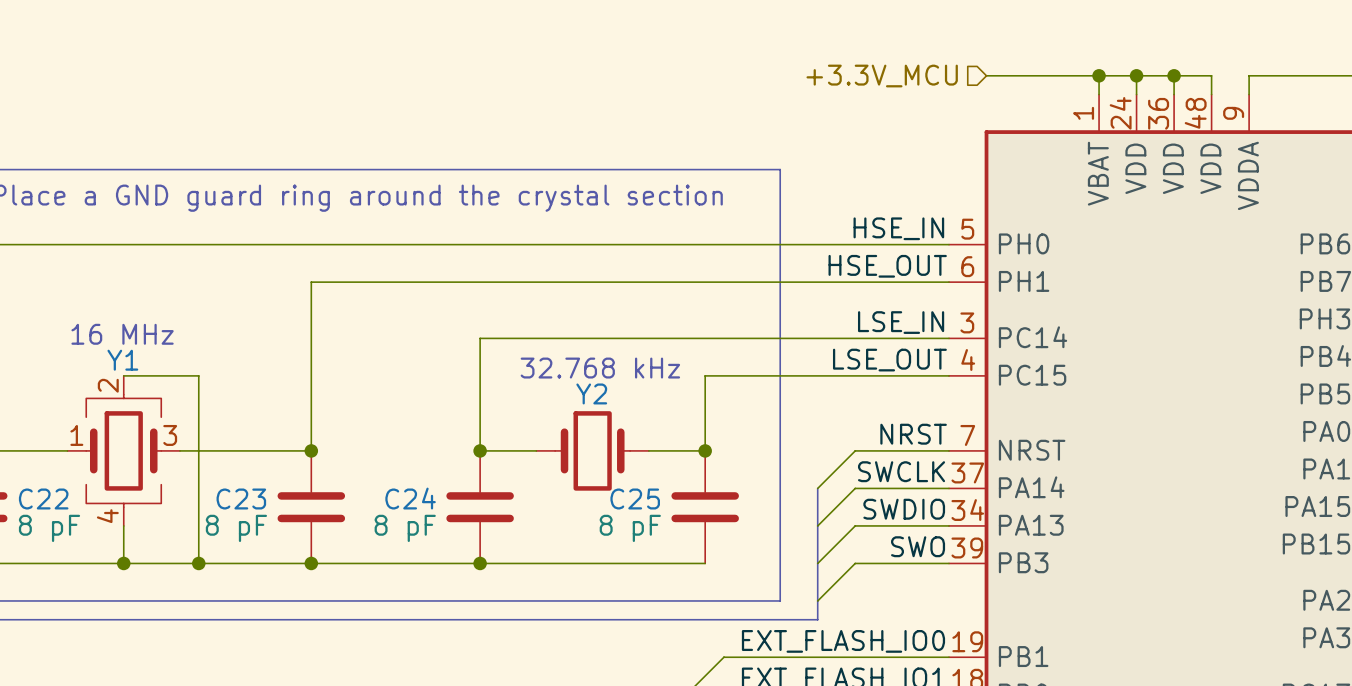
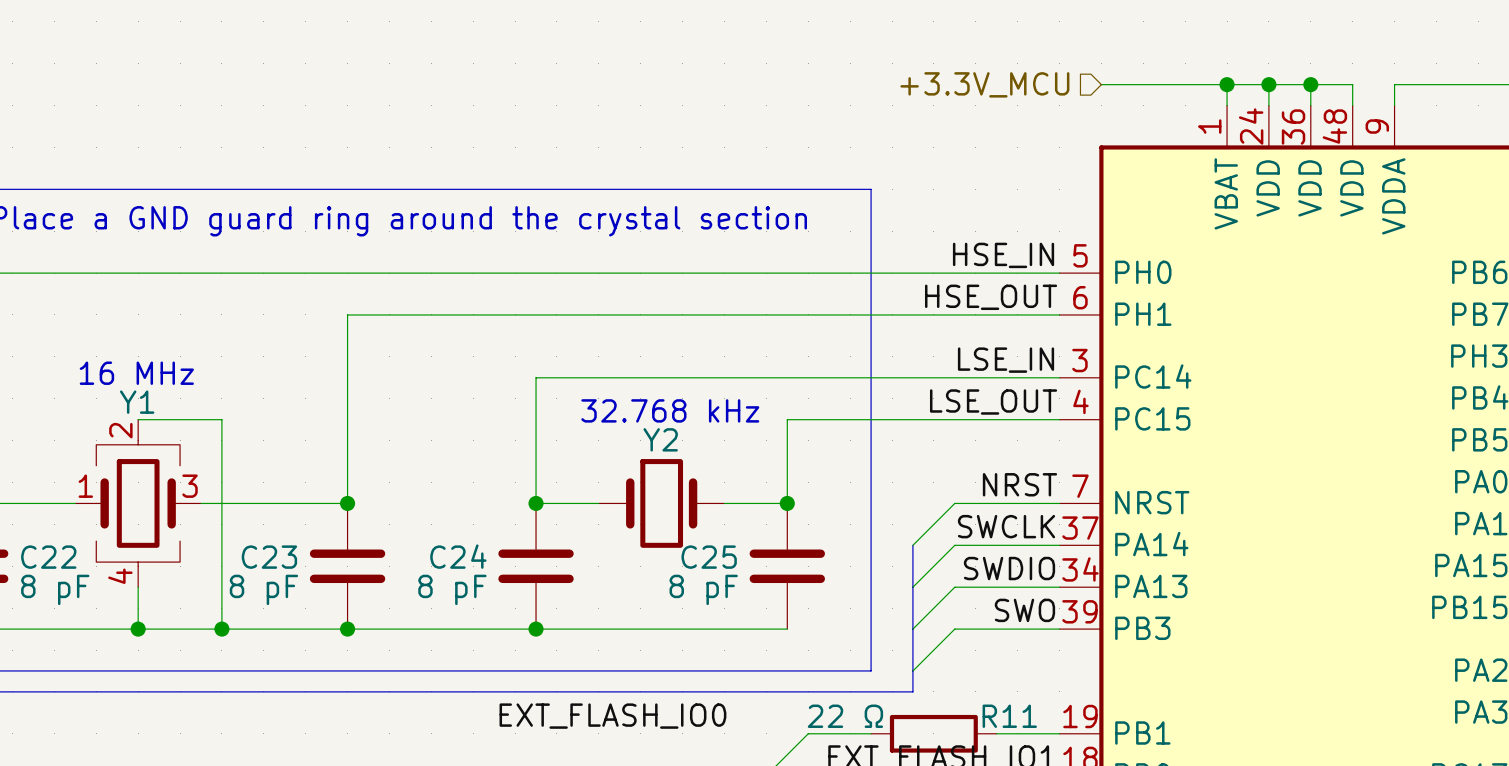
label: none -> EXT_FLASH_IO0 (612, 716)
label: EXT_FLASH_IO0 (843, 641) -> none
wire: (780, 657) (892, 657) -> none
R11: none -> 22 Ω (933, 733)

